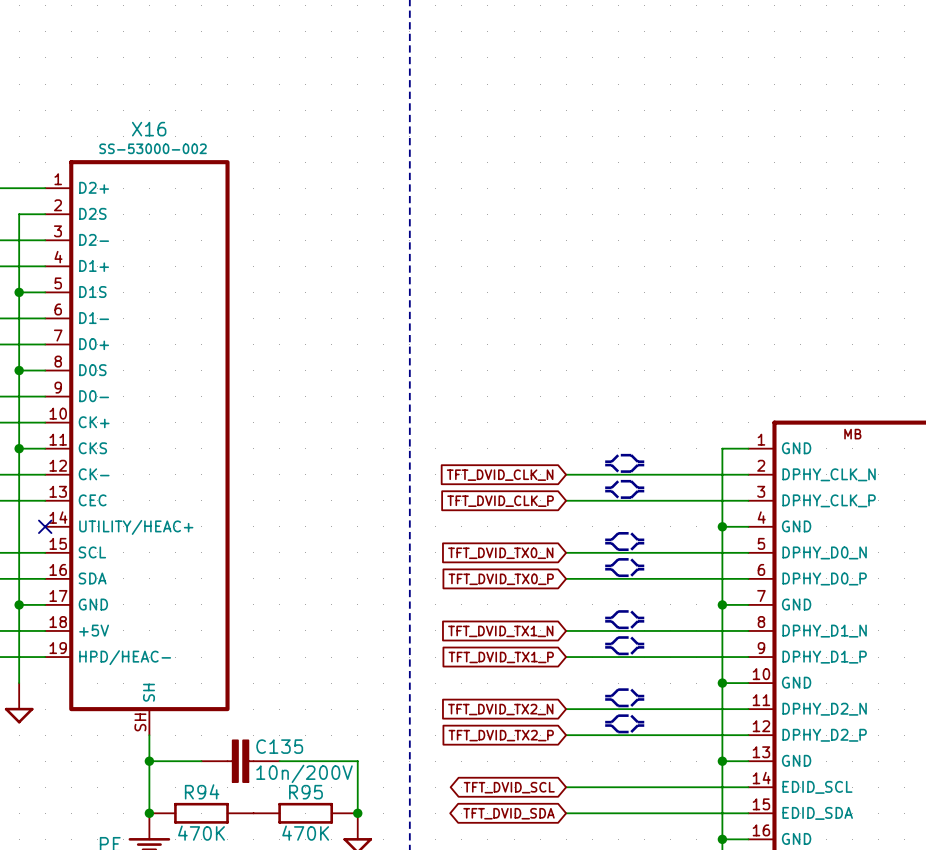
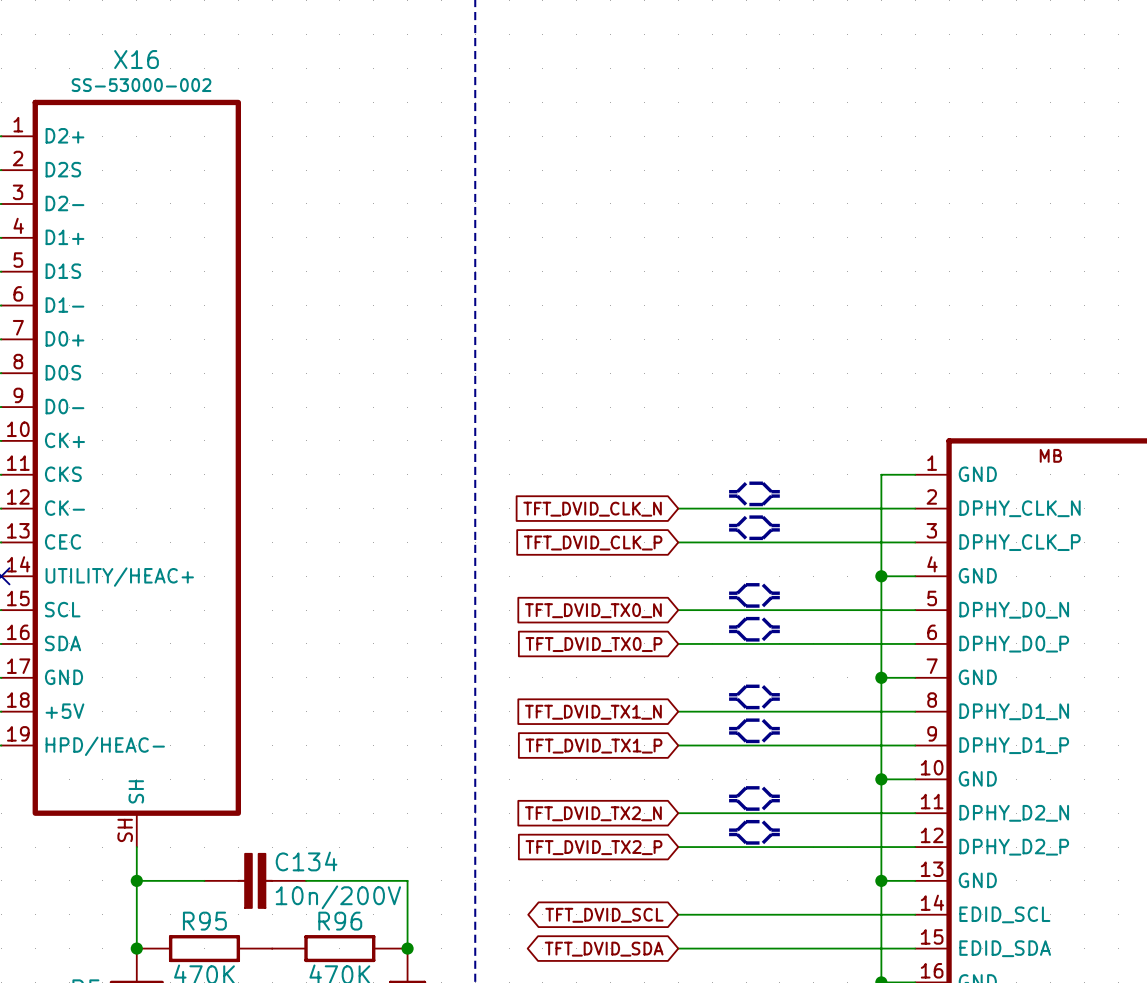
C135 name: C135 (279, 746) -> C134 (306, 861)
R94 name: R94 (202, 791) -> R95 (204, 921)
R95 name: R95 (305, 792) -> R96 (340, 921)

